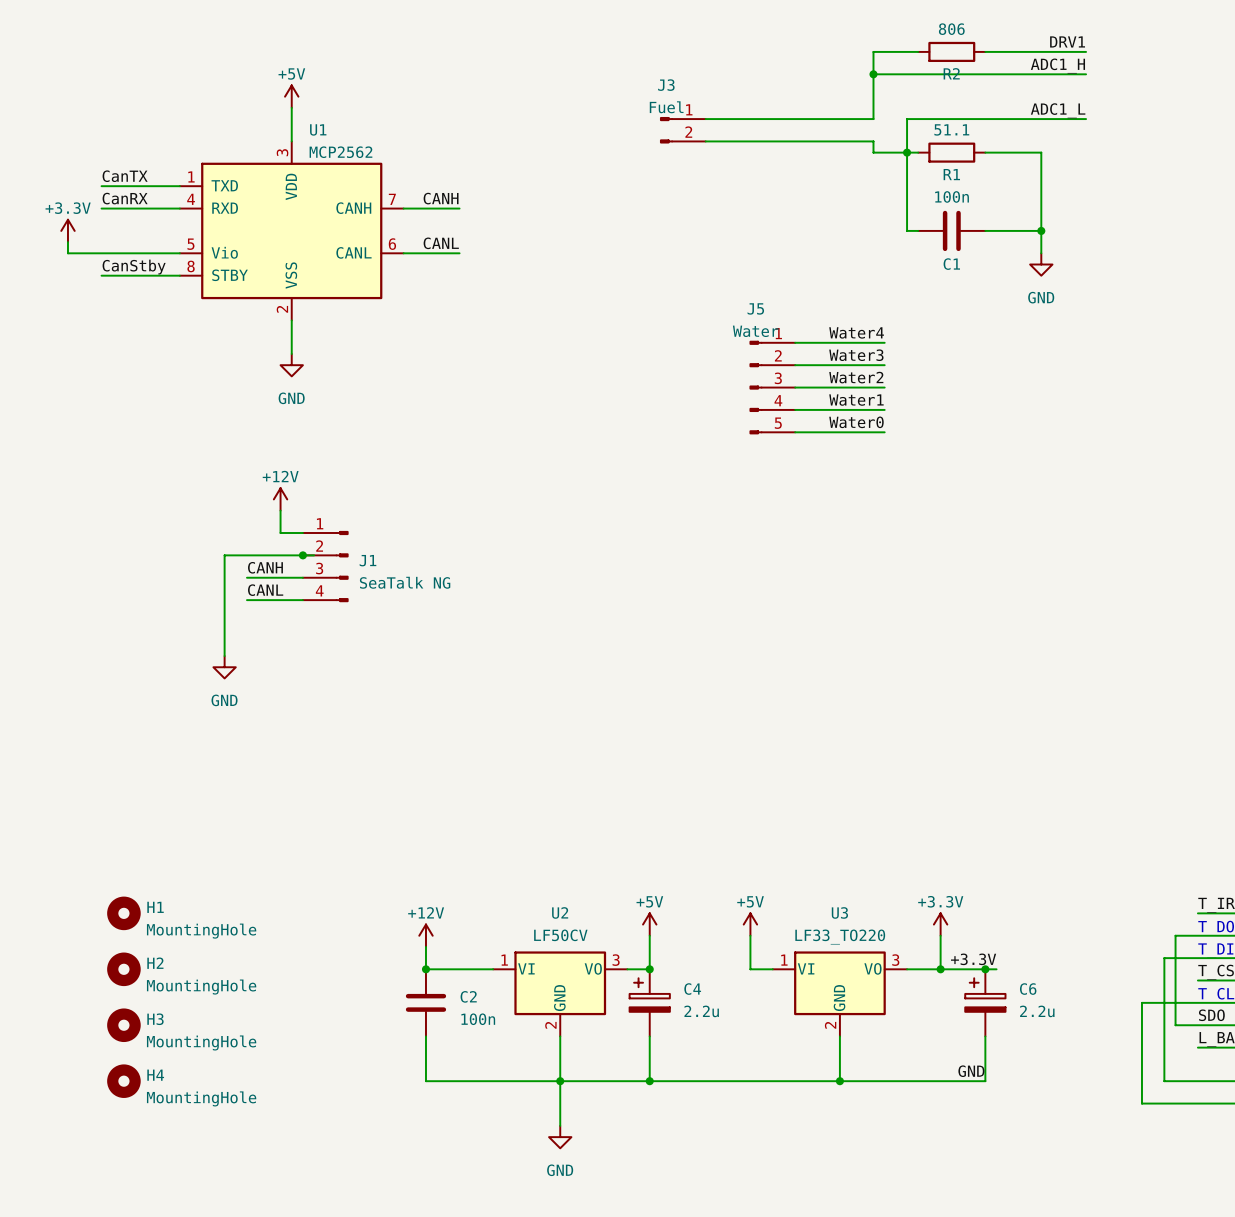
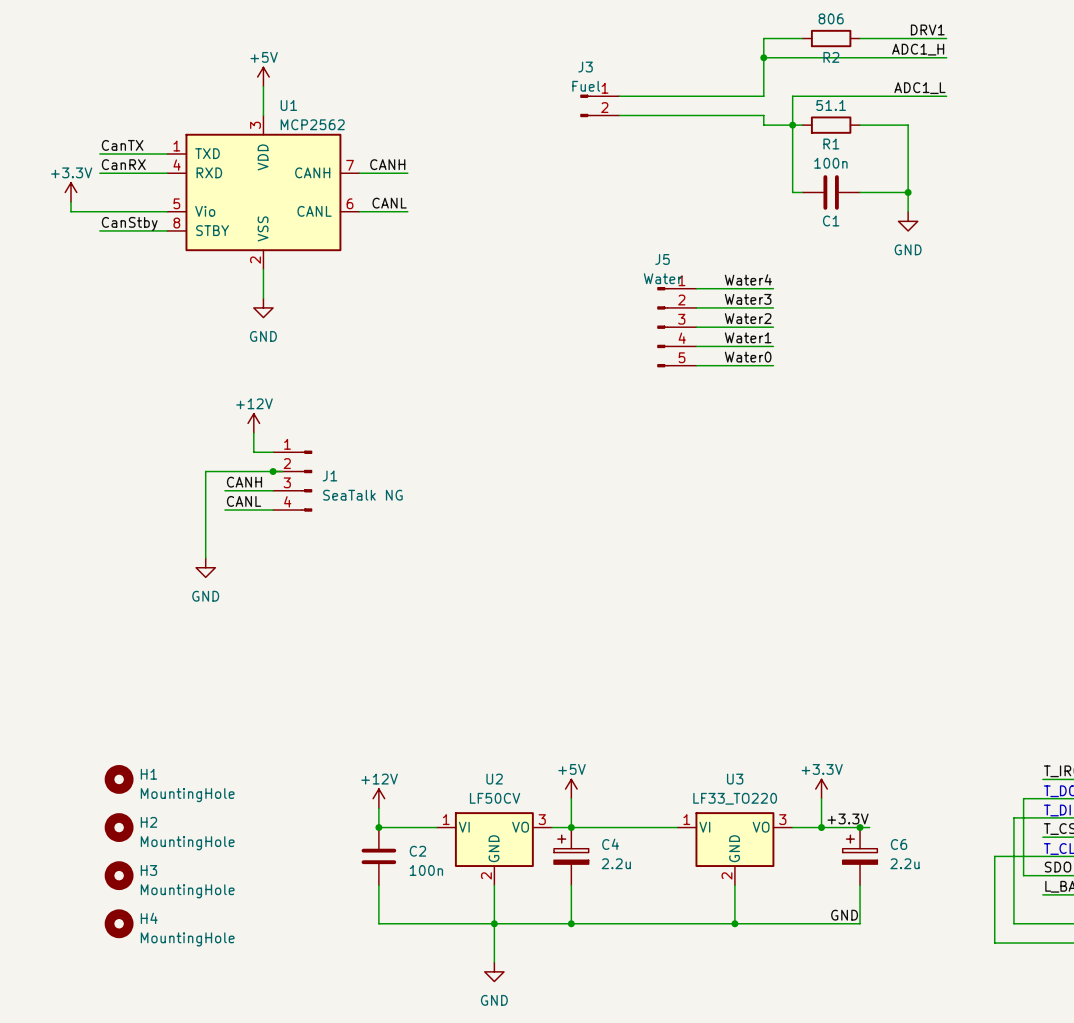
power symbol: +5V (750, 924) -> none
wire: (750, 935) (750, 969) -> (571, 827) (657, 827)

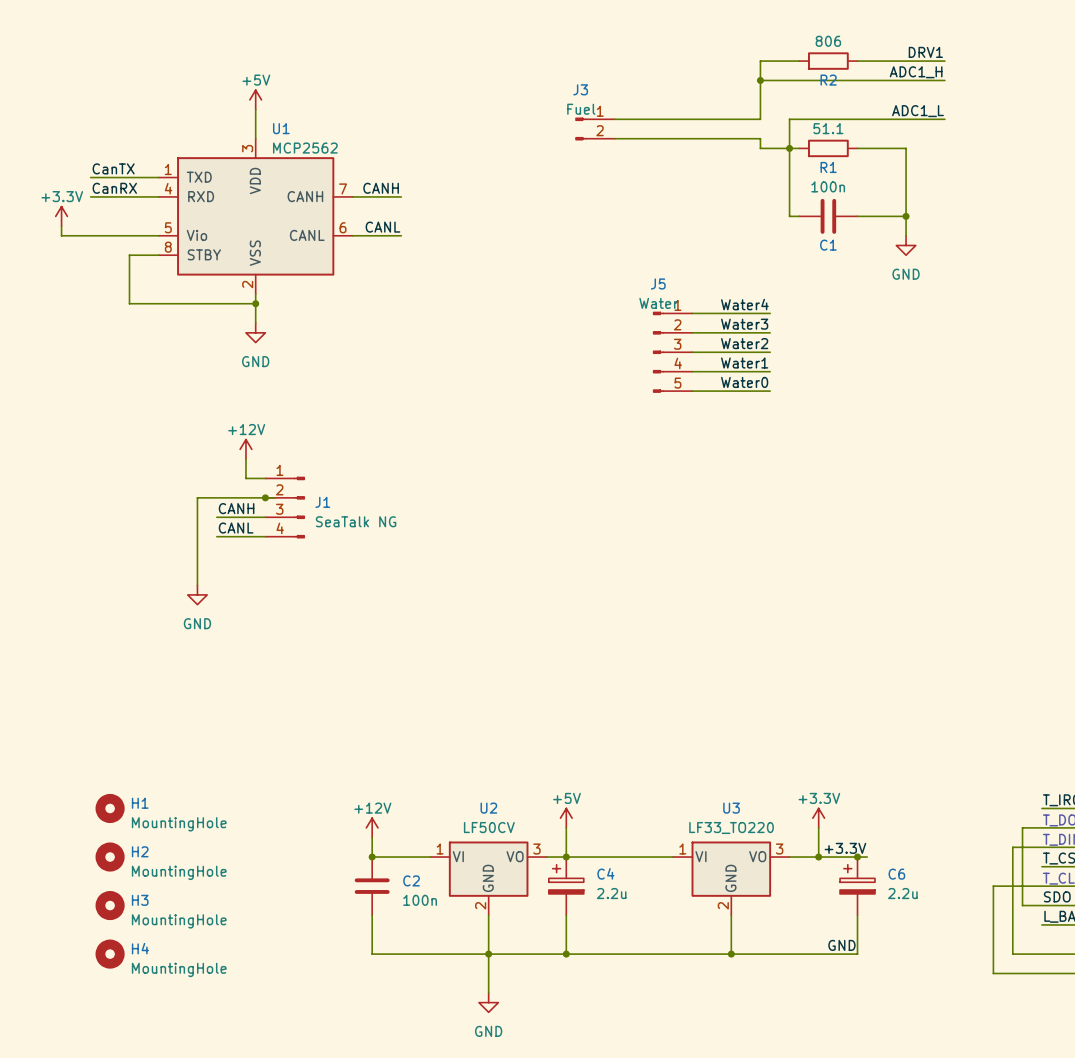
label: CanStby (129, 223) -> none
wire: (99, 230) (138, 230) -> (255, 303) (129, 303) (129, 255)
junction: none -> (255, 303)

